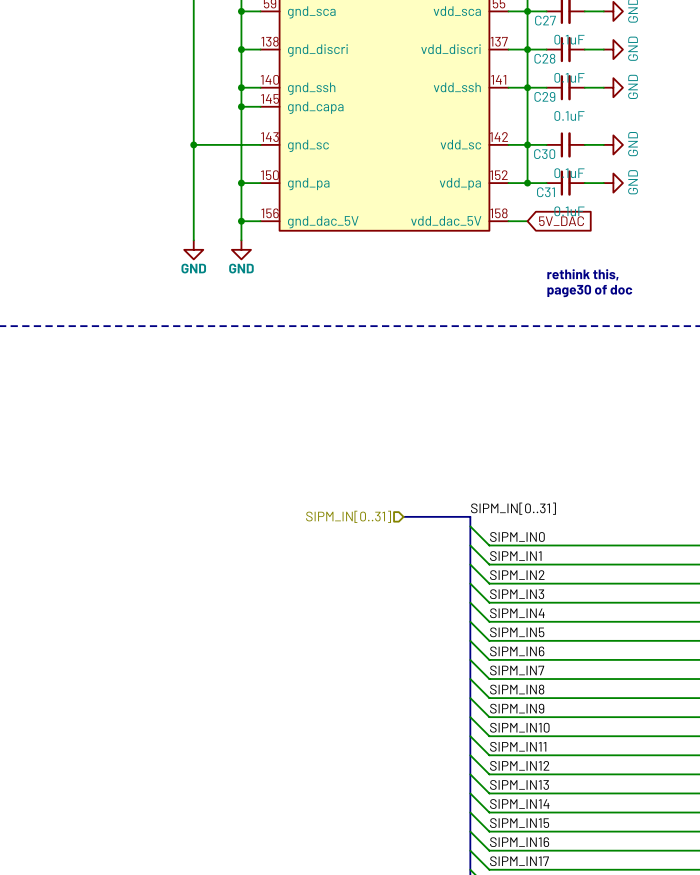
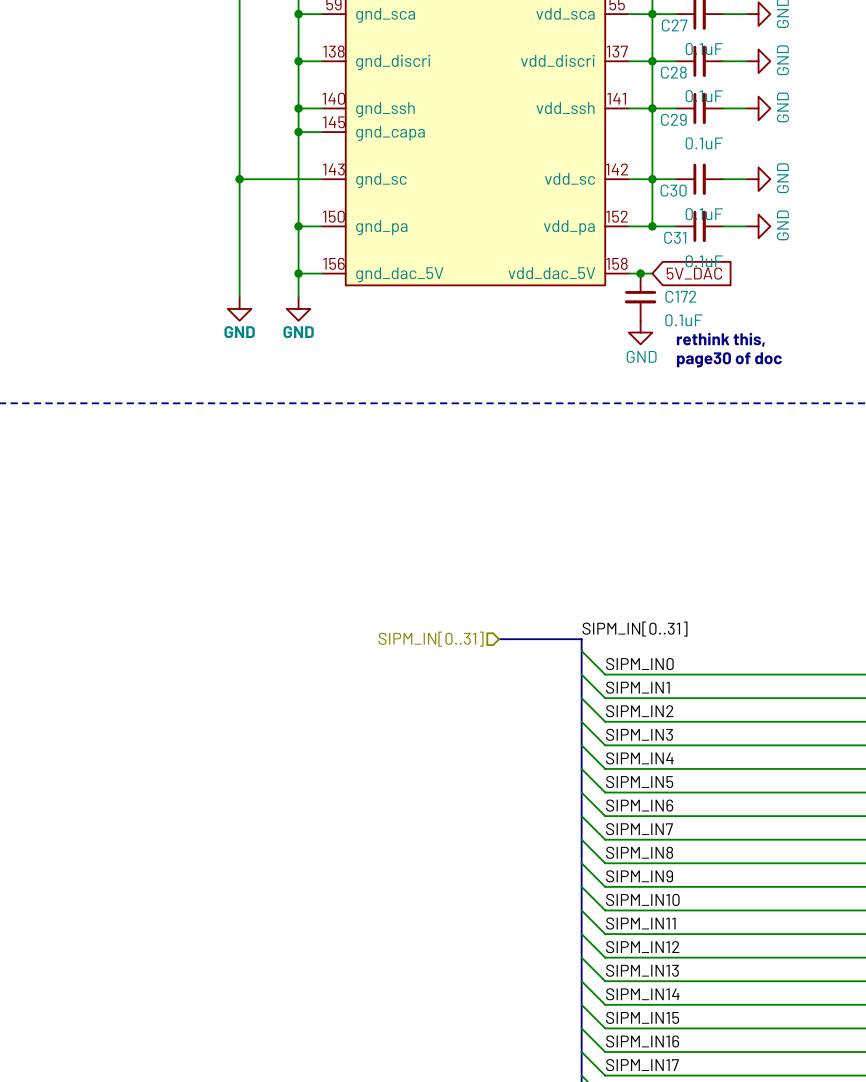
junction: none -> (640, 273)
C172: none -> 0.1uF (640, 297)
power symbol: none -> GND (640, 332)

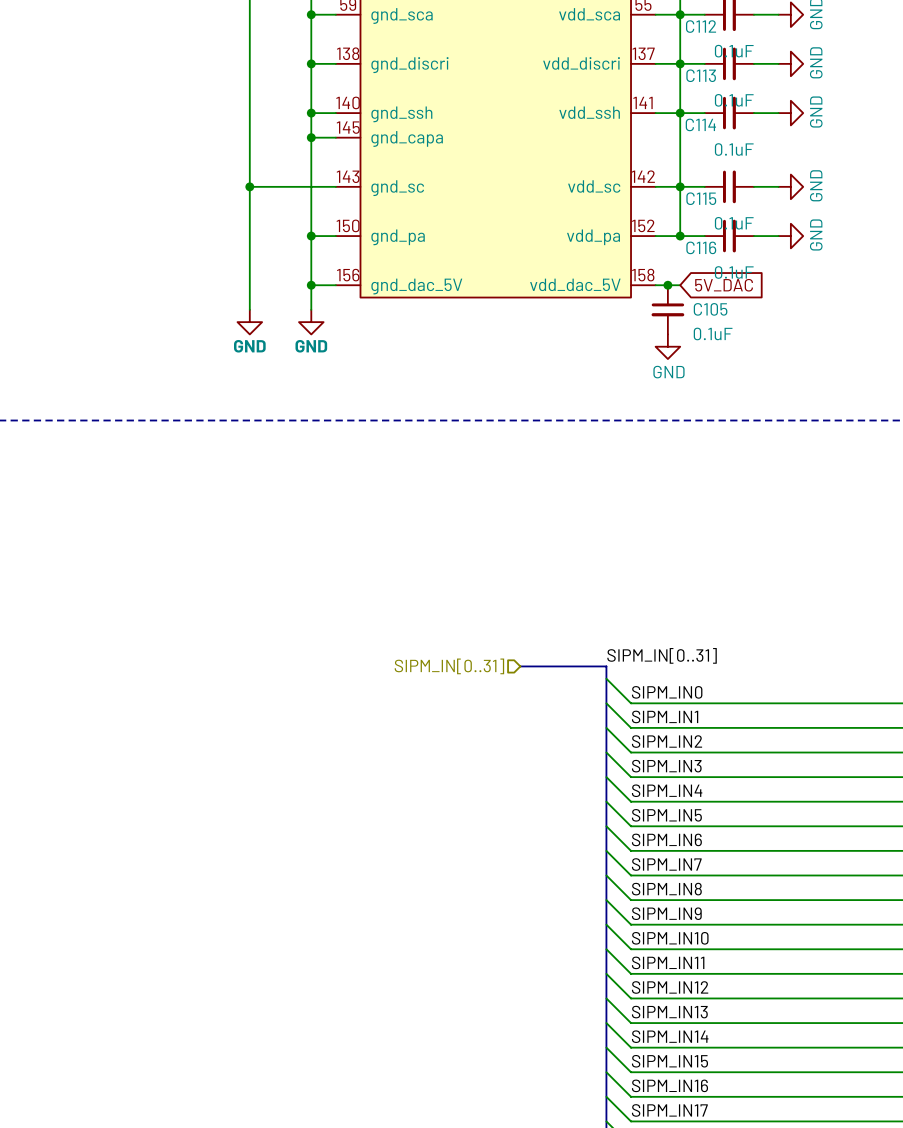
C27 name: C27 (674, 25) -> C112 (701, 26)
C28 name: C28 (673, 72) -> C113 (701, 75)
C29 name: C29 (673, 119) -> C114 (700, 124)
C30 name: C30 (673, 190) -> C115 (701, 198)
C31 name: C31 (675, 237) -> C116 (701, 247)
C172 name: C172 (680, 296) -> C105 (710, 309)
text: rethink this, (720, 339) -> none
text: page30 of doc (729, 359) -> none

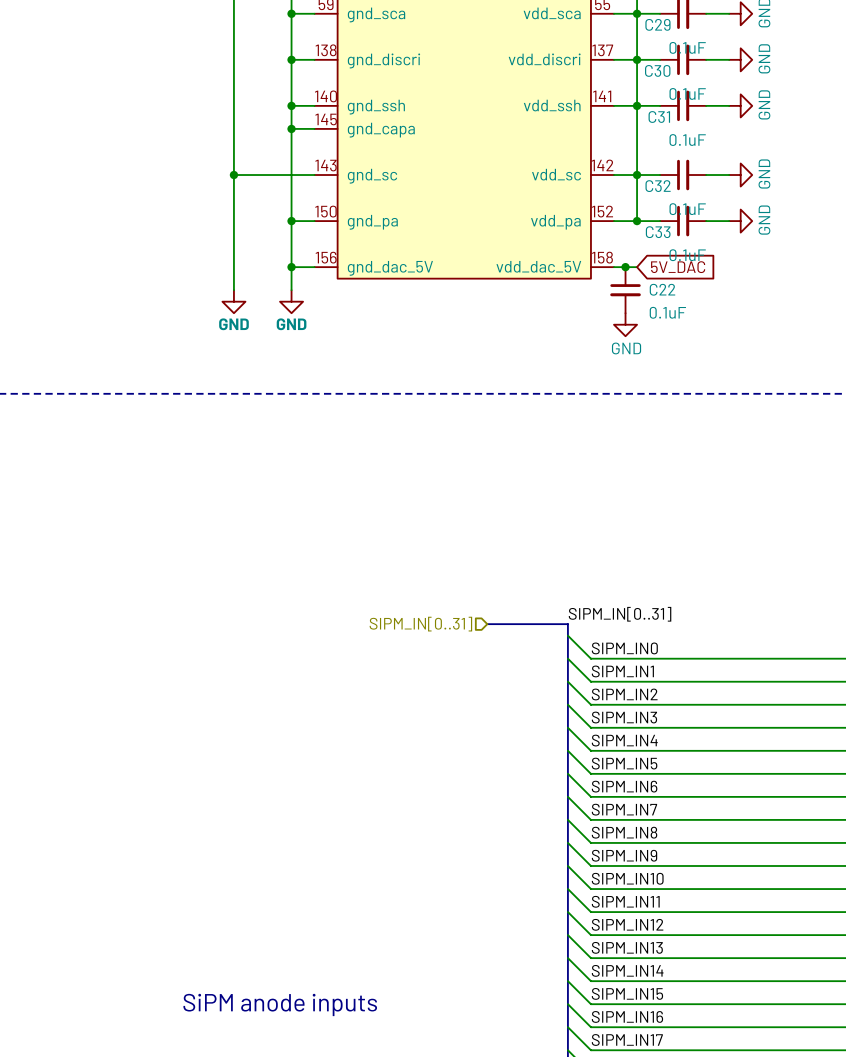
C112 name: C112 (701, 26) -> C29 (657, 24)
C113 name: C113 (701, 75) -> C30 (657, 70)
C114 name: C114 (700, 124) -> C31 (659, 117)
C115 name: C115 (701, 198) -> C32 (658, 186)
C116 name: C116 (701, 247) -> C33 (658, 232)
C105 name: C105 (710, 309) -> C22 (662, 289)
text: none -> SiPM anode inputs (280, 1004)

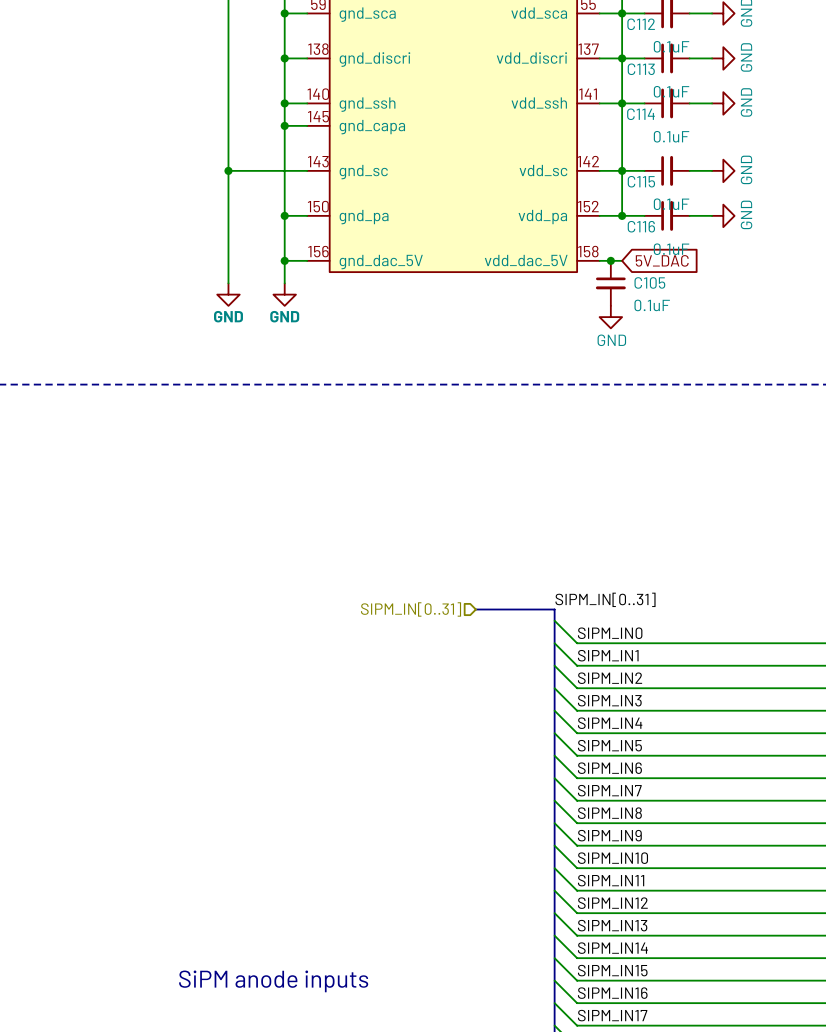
C29 name: C29 (657, 24) -> C112 (641, 24)
C30 name: C30 (657, 70) -> C113 (641, 69)
C31 name: C31 (659, 117) -> C114 (641, 114)
C32 name: C32 (658, 186) -> C115 (641, 181)
C33 name: C33 (658, 232) -> C116 (641, 226)
C22 name: C22 (662, 289) -> C105 (649, 282)

